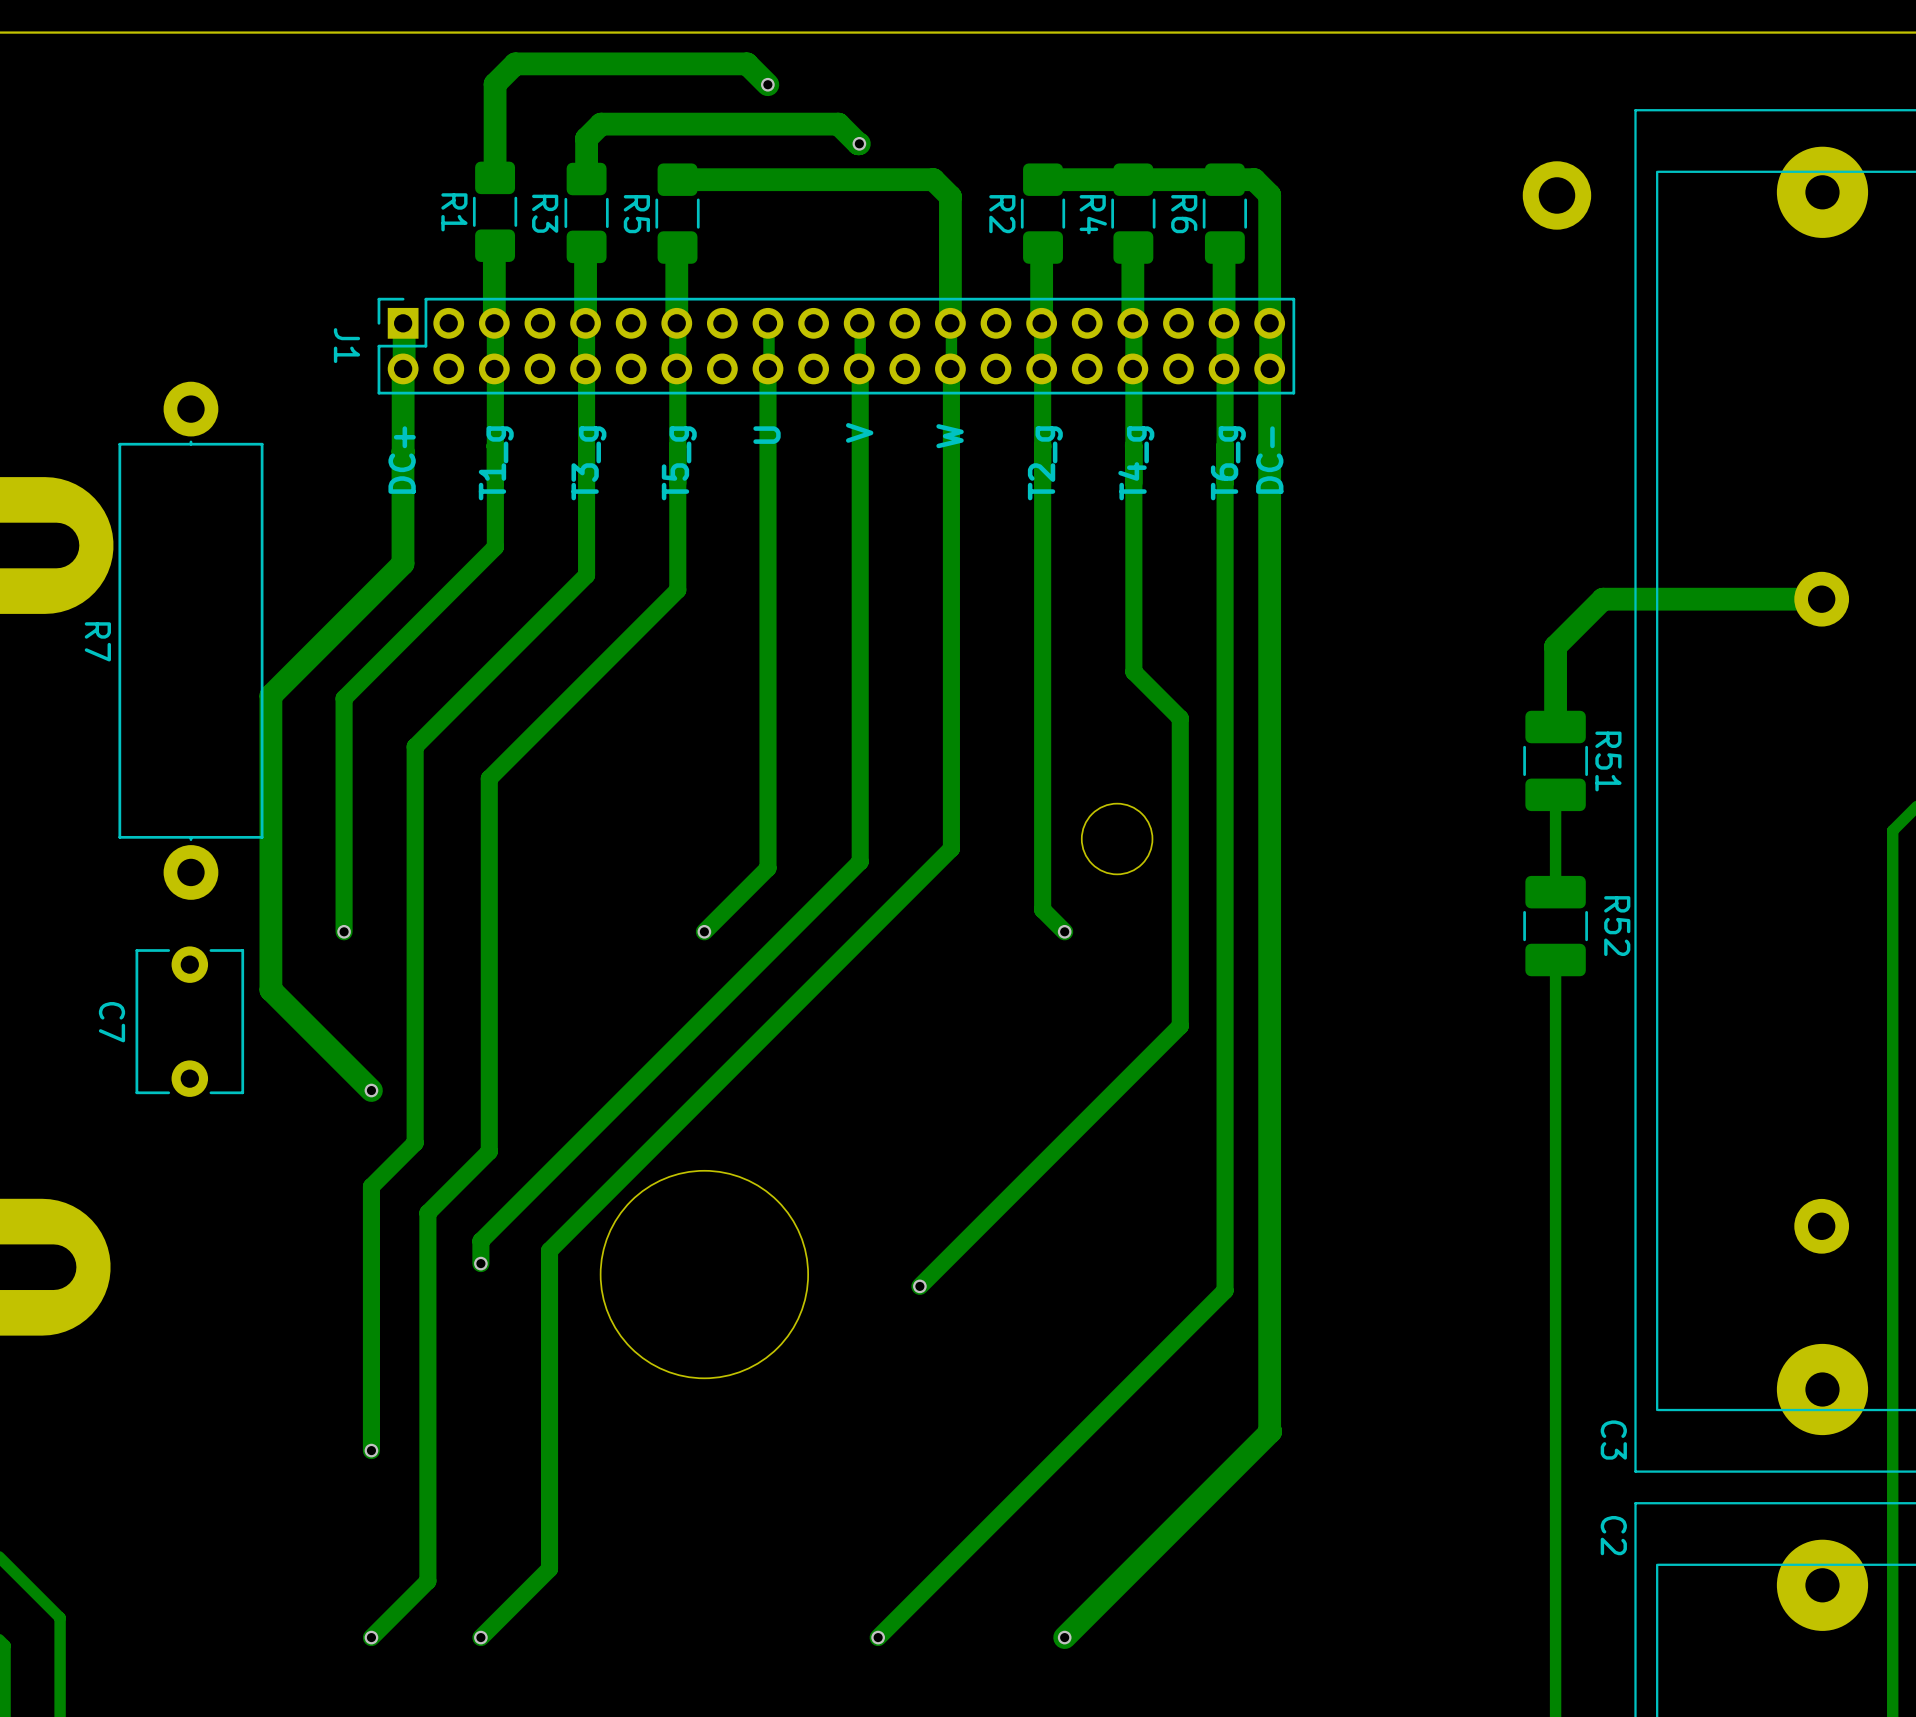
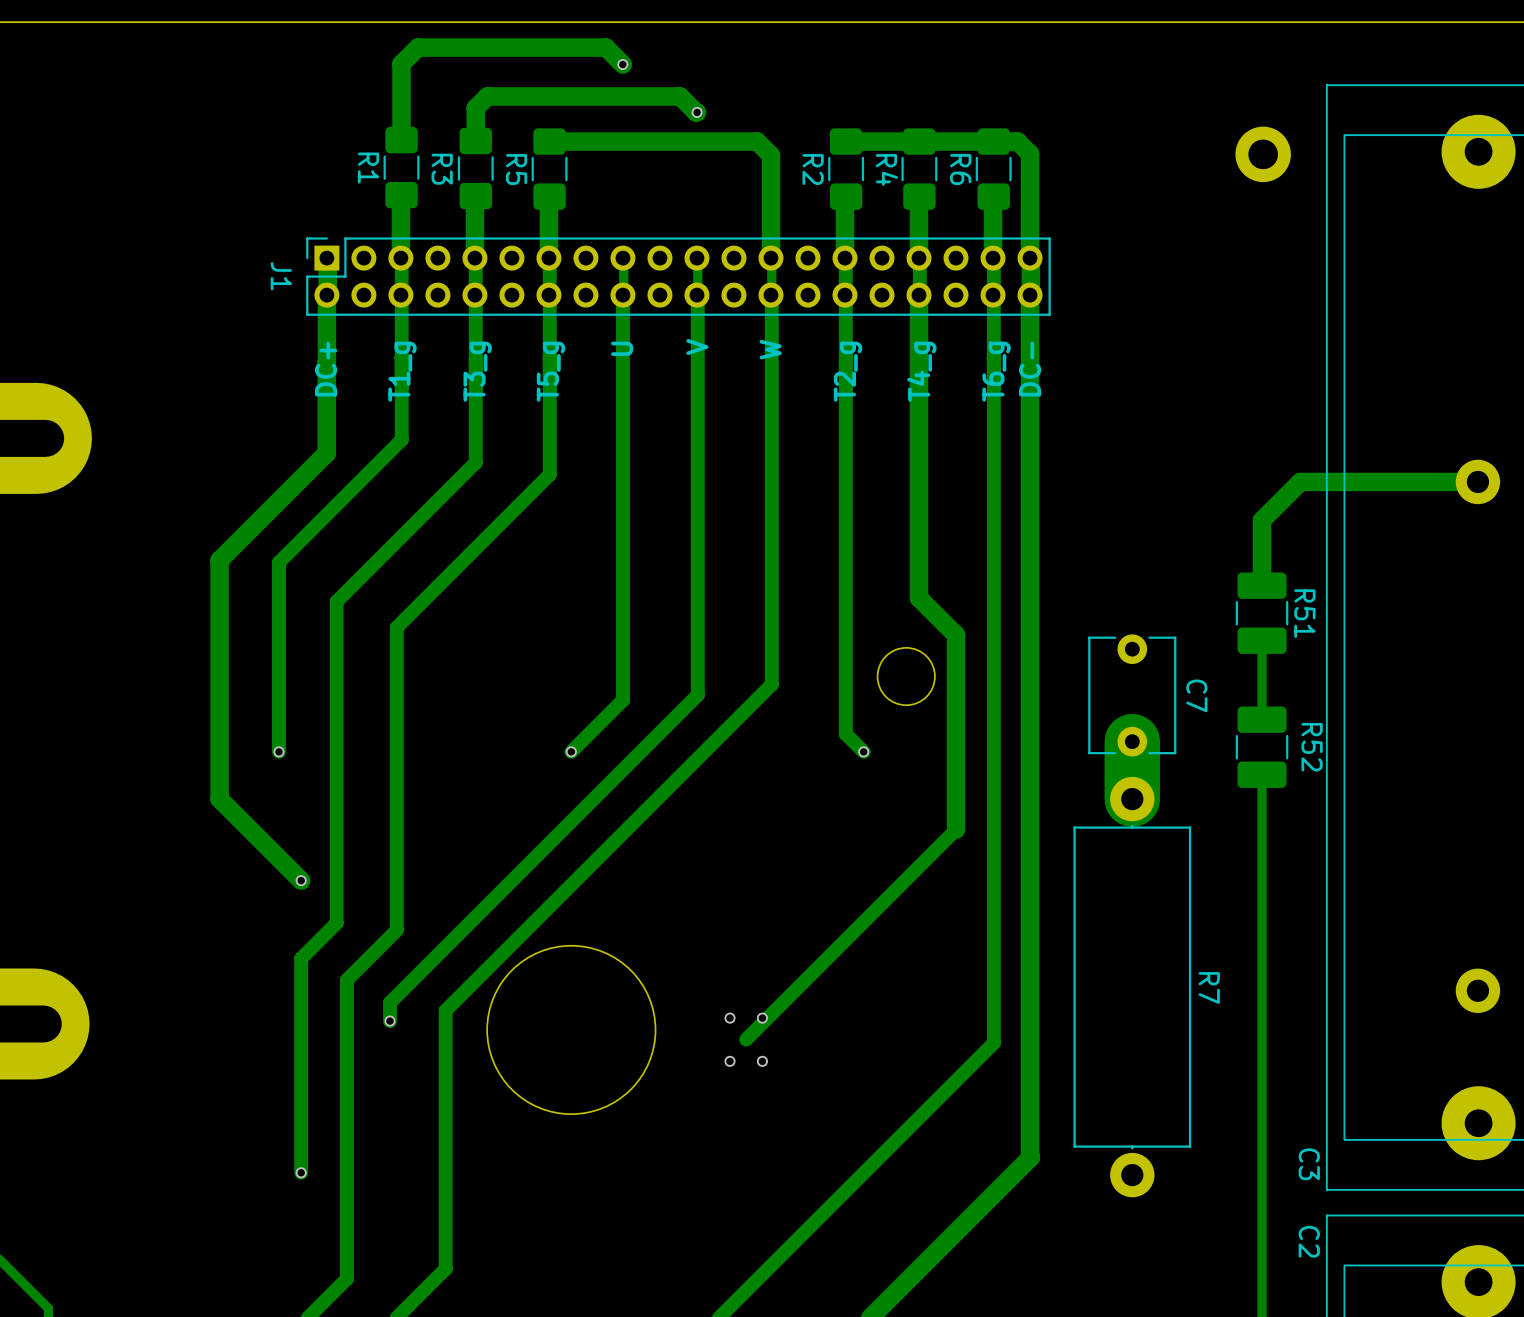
track: (1133, 366) (1133, 671) (1180, 718) (1180, 1025) (1178, 1027) -> (919, 295) (919, 598) (956, 635) (956, 829)
R7 position: (190, 640) -> (1132, 987)
R7 name position: R7 (97, 641) -> R7 (1209, 987)
track: none -> (1132, 741) (1132, 799)
C7 position: (189, 1021) -> (1132, 695)
C7 name position: C7 (111, 1022) -> C7 (1196, 695)
via: none -> (730, 1018)
via: none -> (762, 1018)
via: (919, 1286) -> none
via: none -> (730, 1061)
via: none -> (762, 1061)

